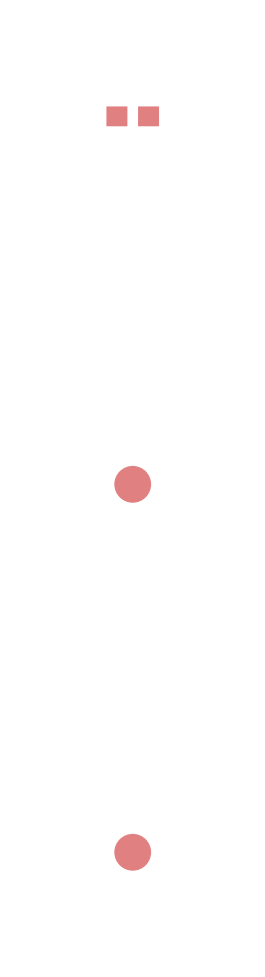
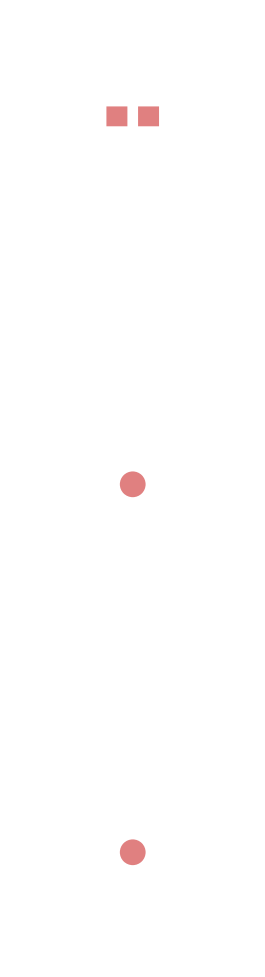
part footprint: [114, 465, 152, 503] -> [119, 471, 146, 498]
part footprint: [114, 833, 152, 871] -> [119, 839, 146, 866]

